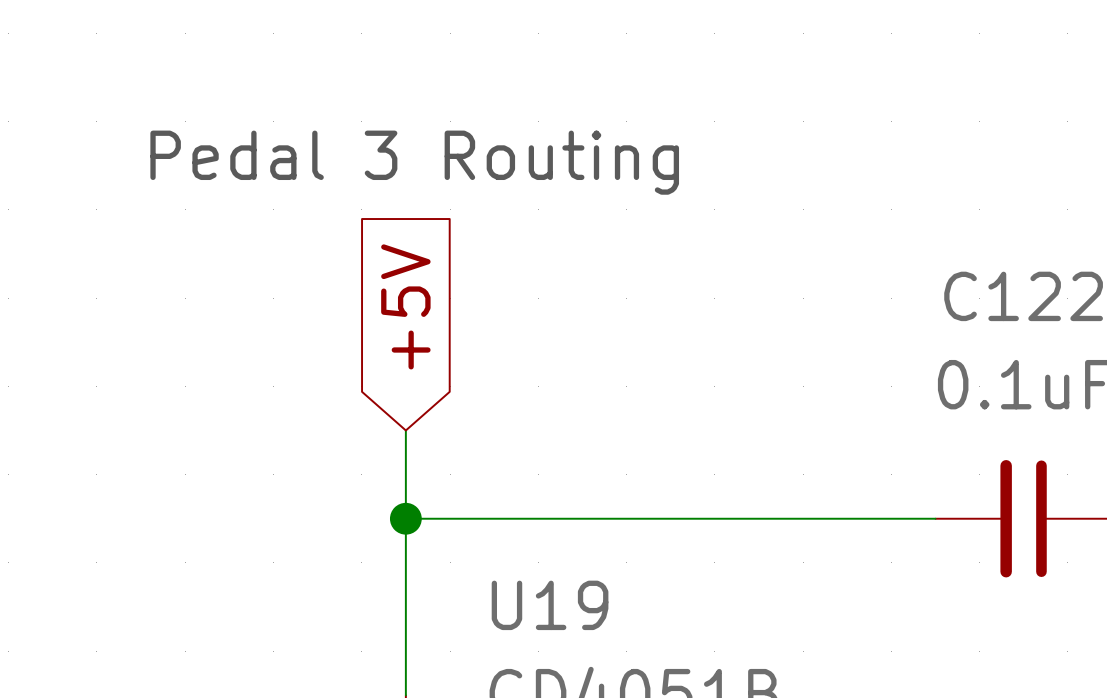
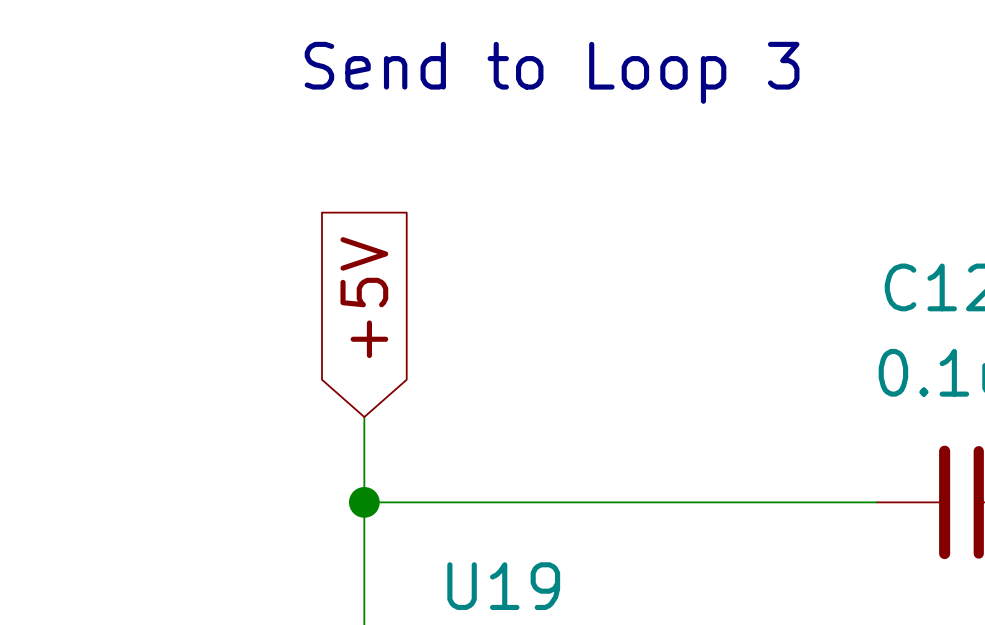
text: none -> Send to Loop 3 (552, 72)
text: Pedal 3 Routing (414, 162) -> none

